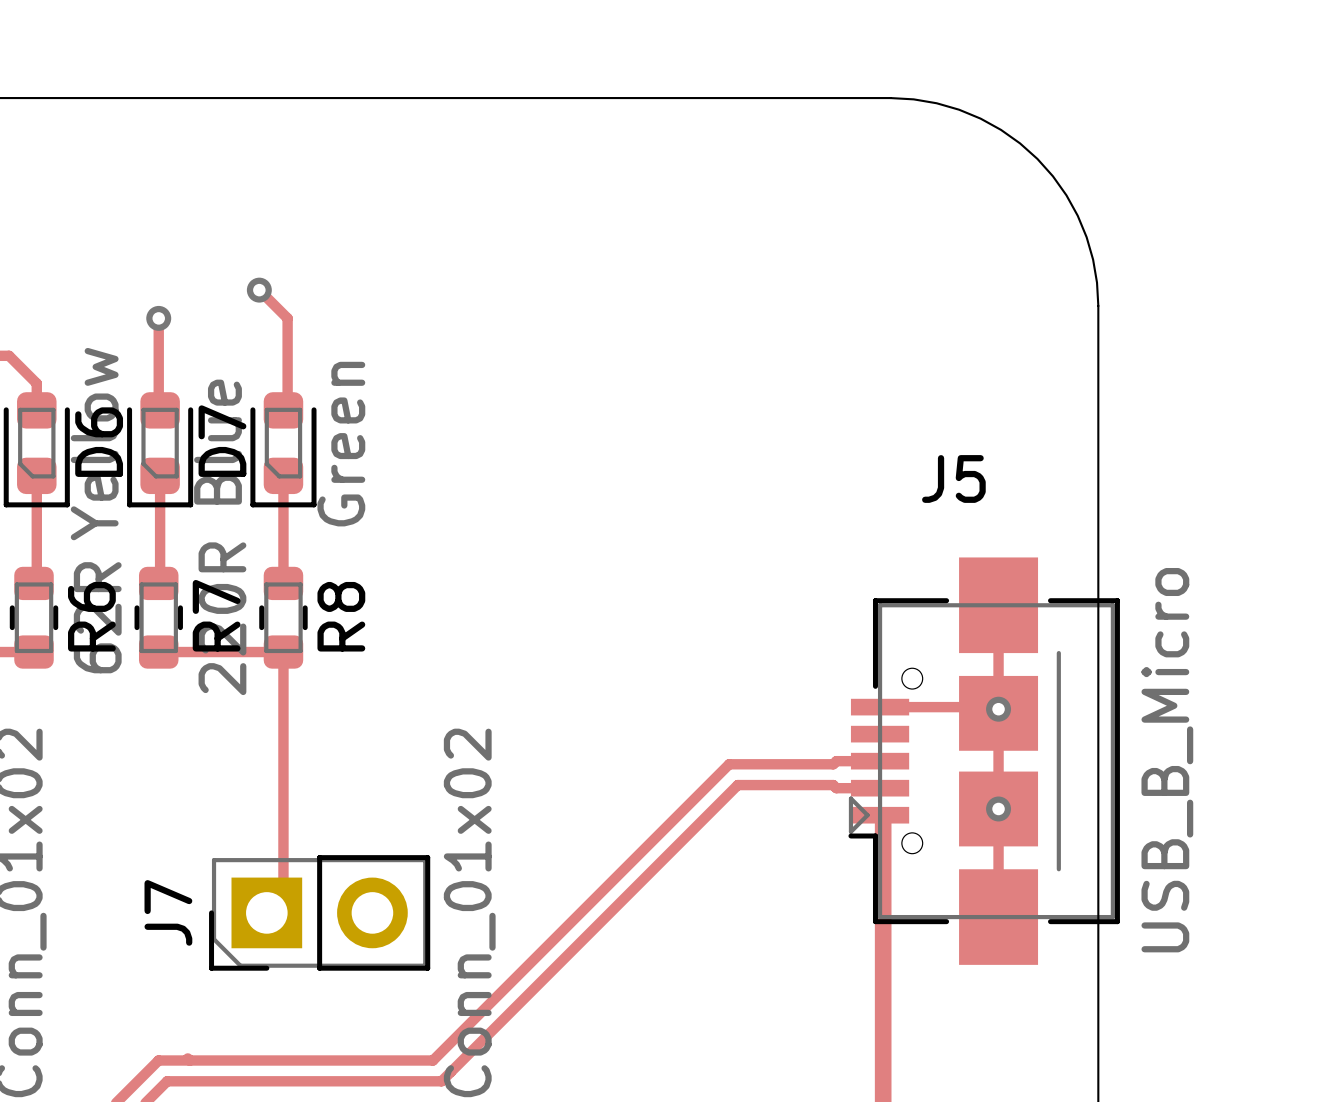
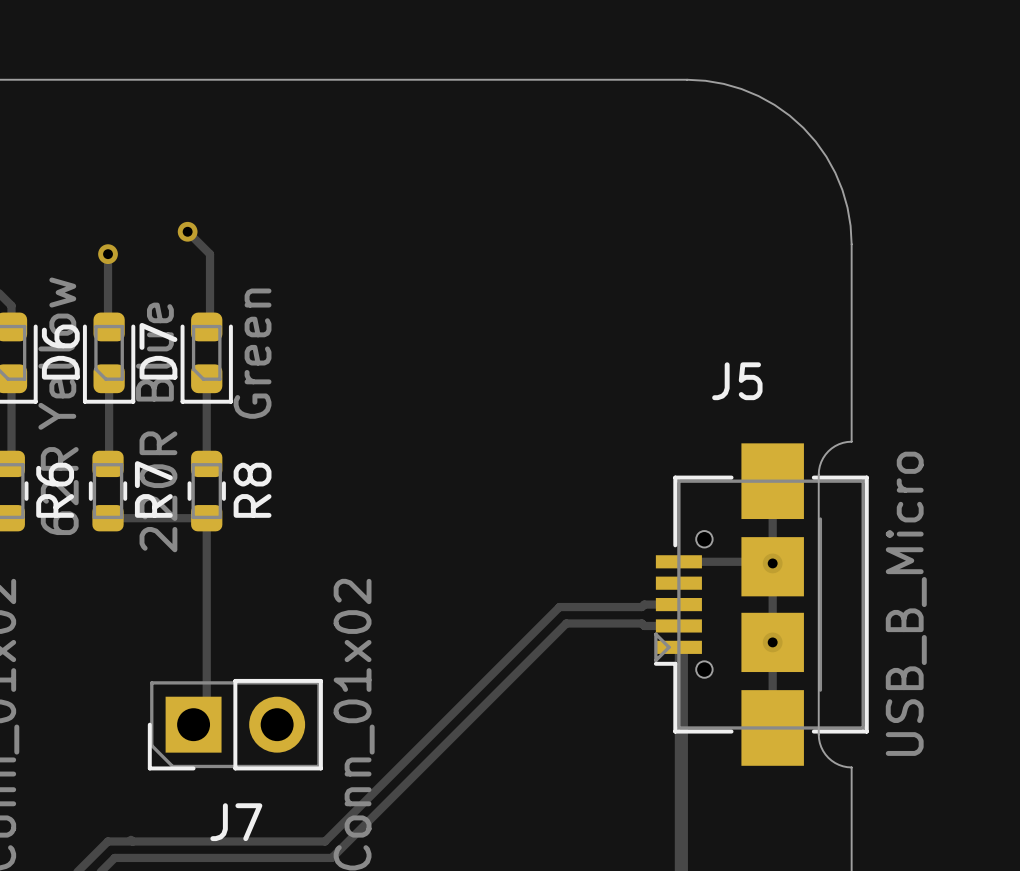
board edge: (1098, 555) (1098, 966) -> (851, 441) (839, 444) (828, 451) (821, 462) (818, 474) (819, 738) (823, 751) (828, 757) (839, 764) (851, 767)
J7 name rotation: 0° (168, 912) -> 90° clockwise (236, 822)
J7 name position: J7 (168, 912) -> J7 (236, 822)

